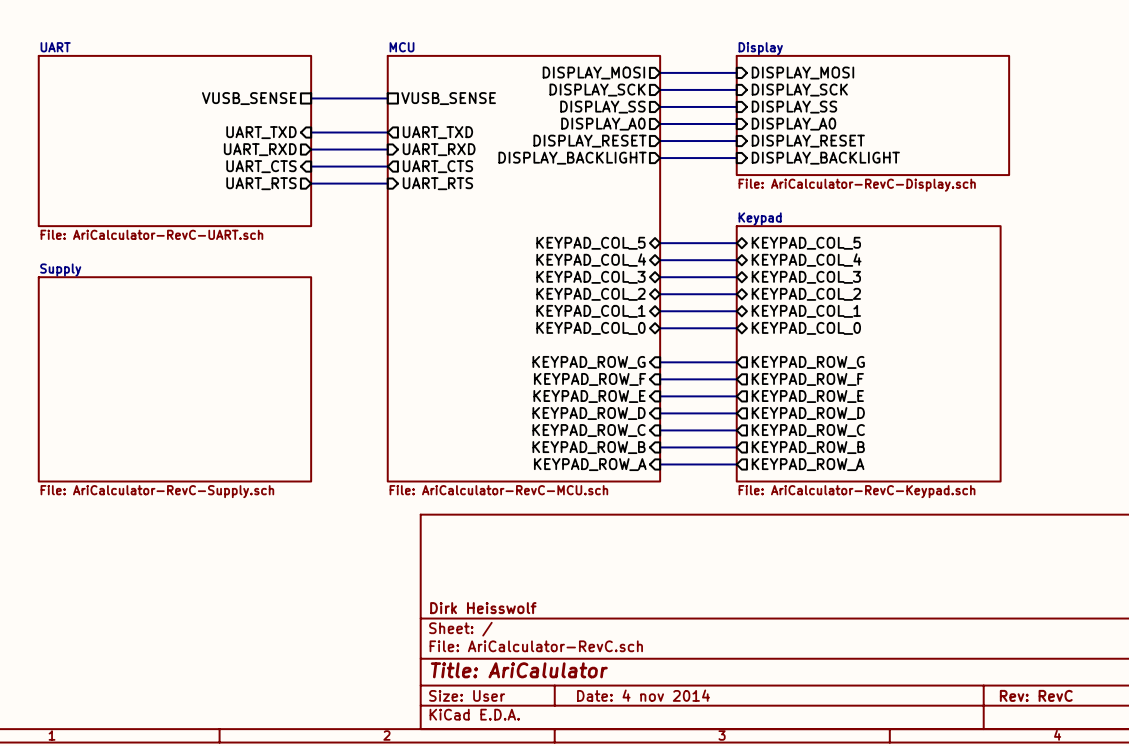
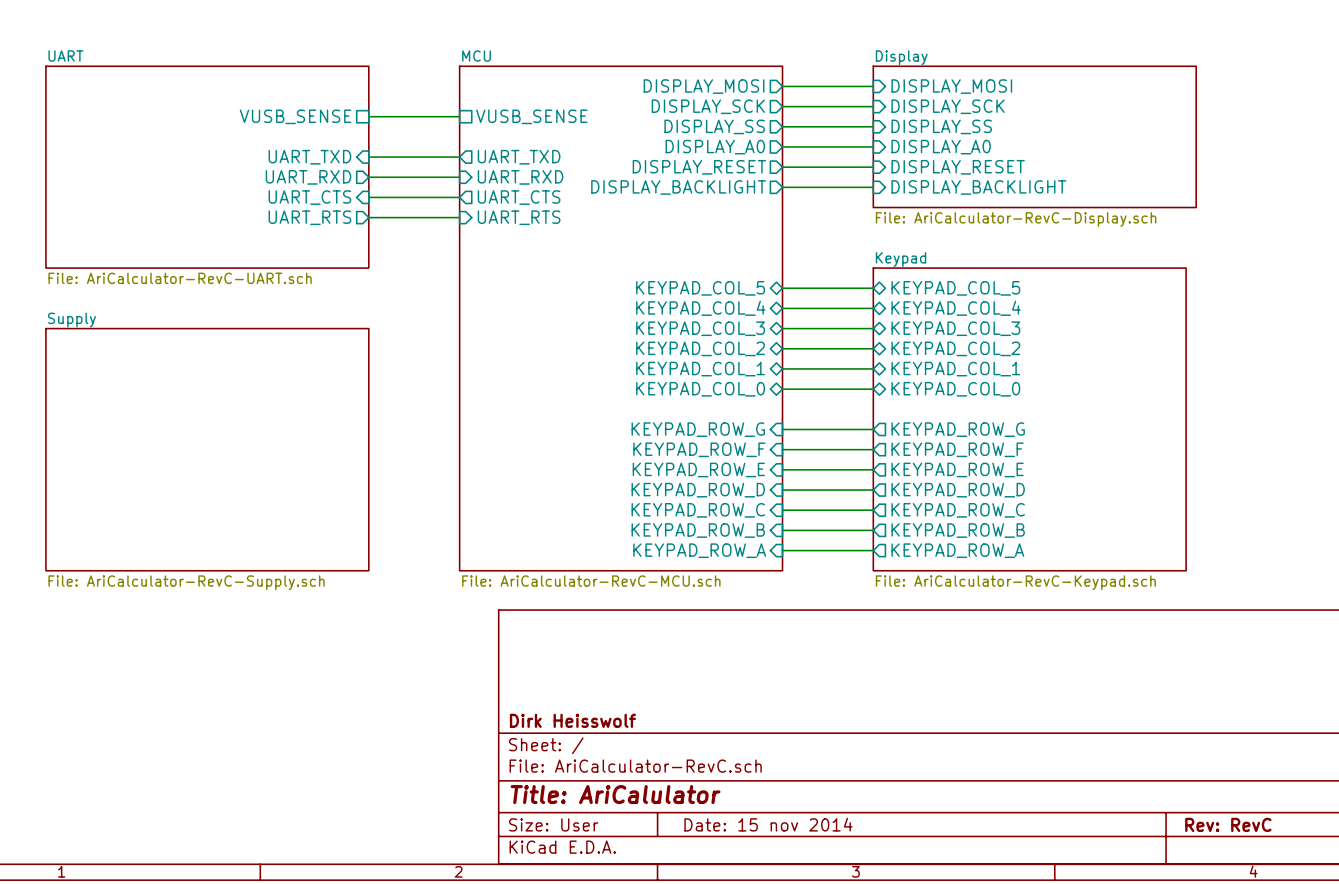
title block: Date: 4 nov 2014 (643, 695) -> Date: 15 nov 2014 (768, 824)

